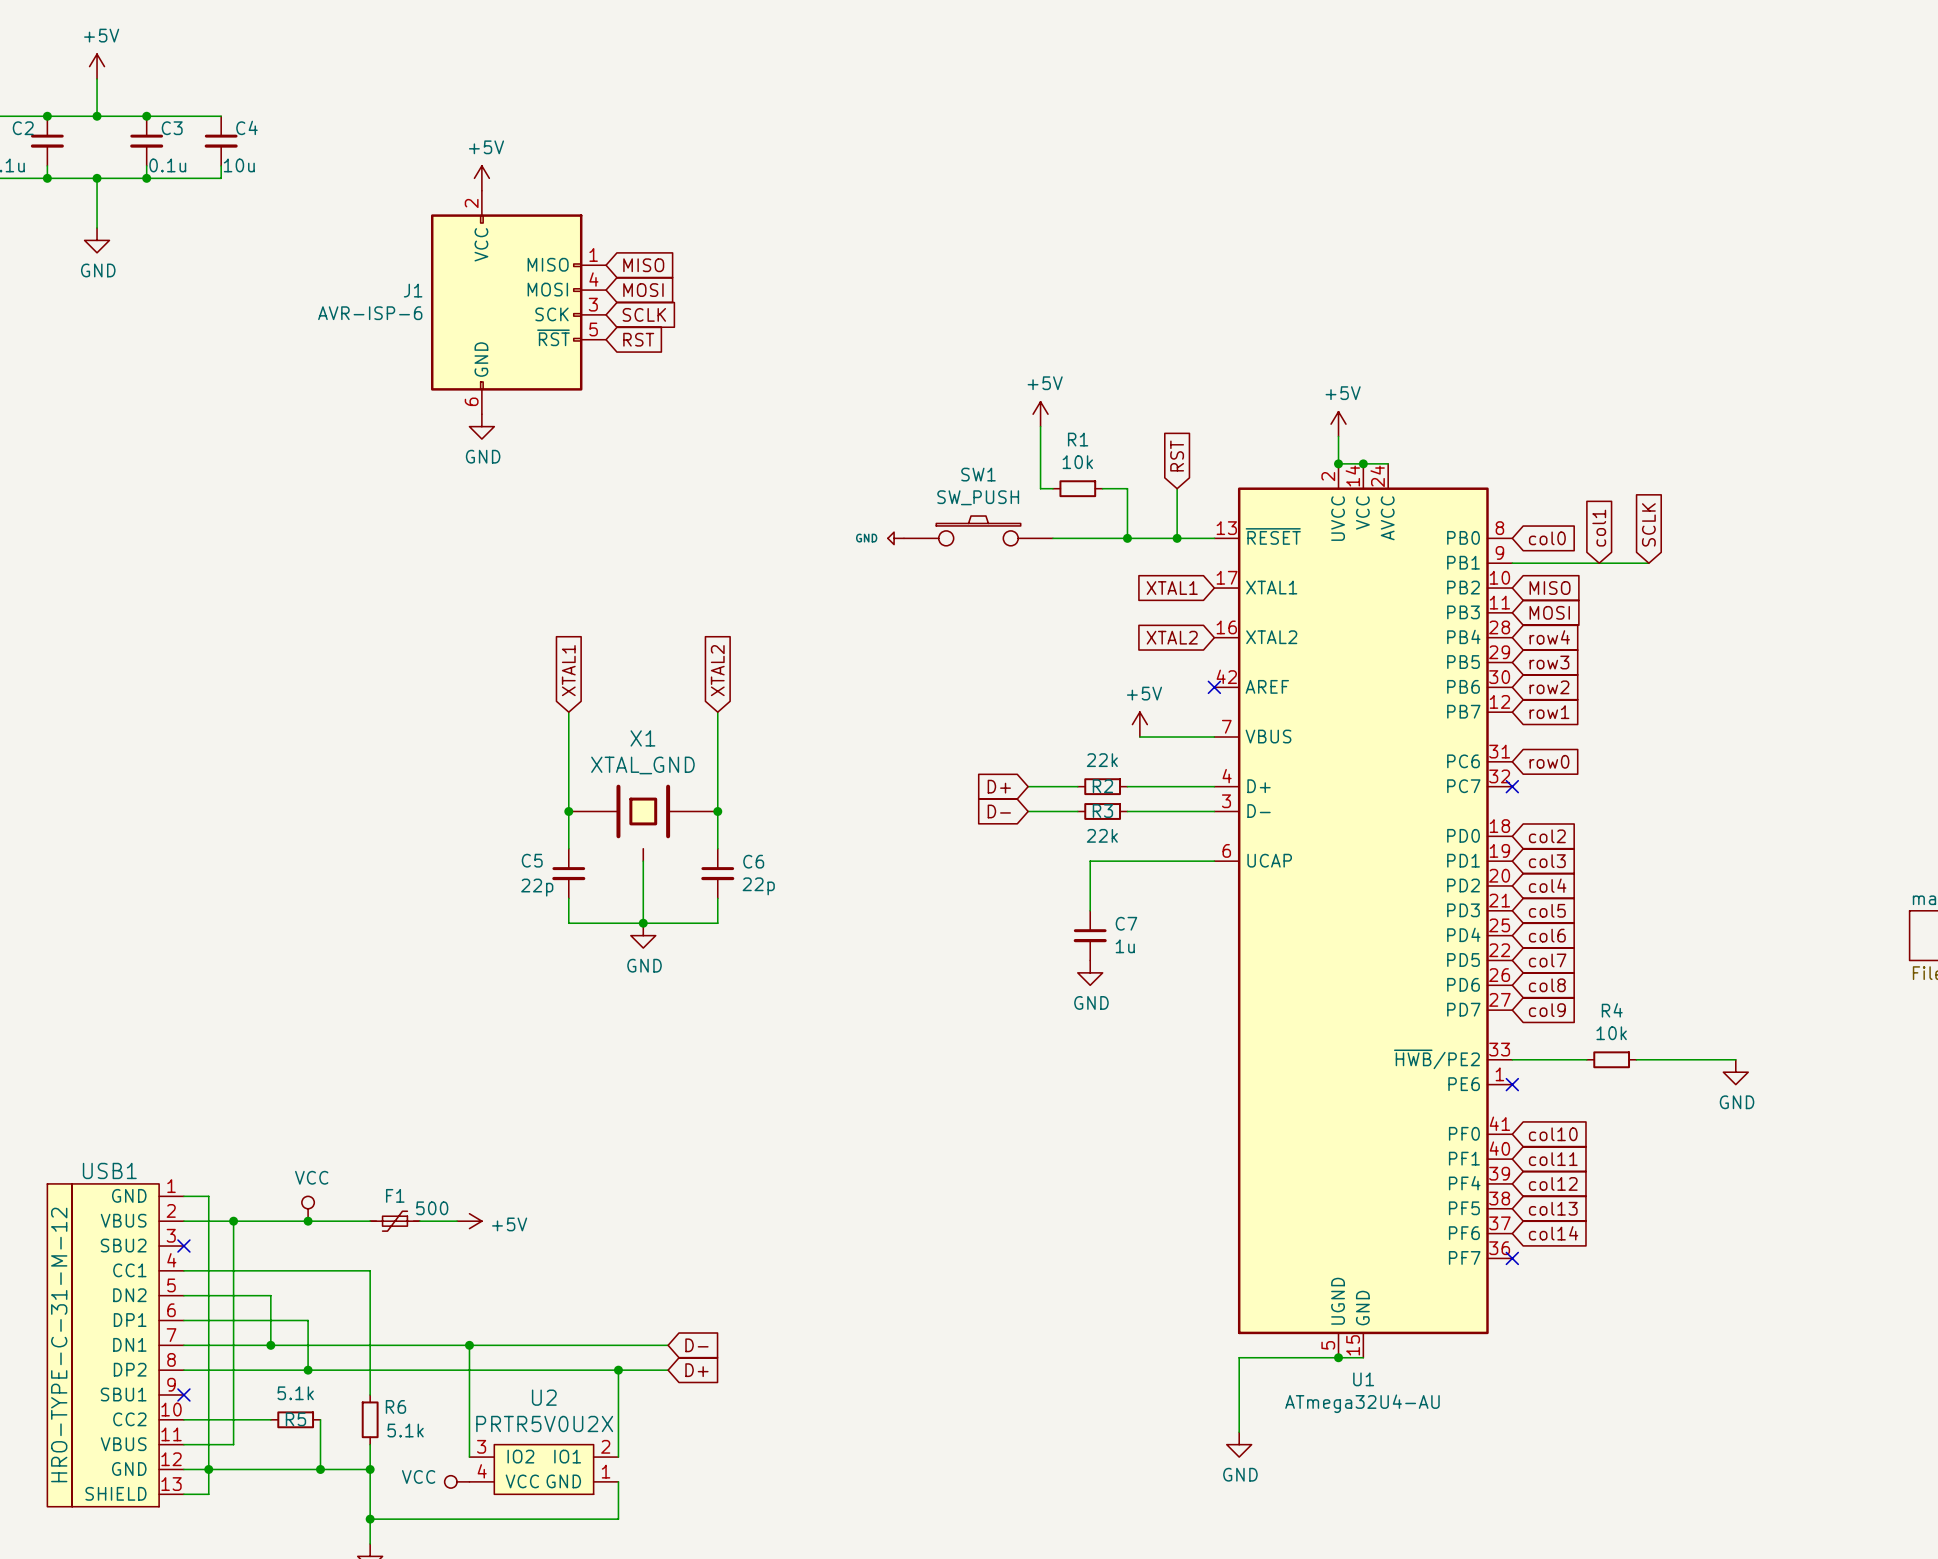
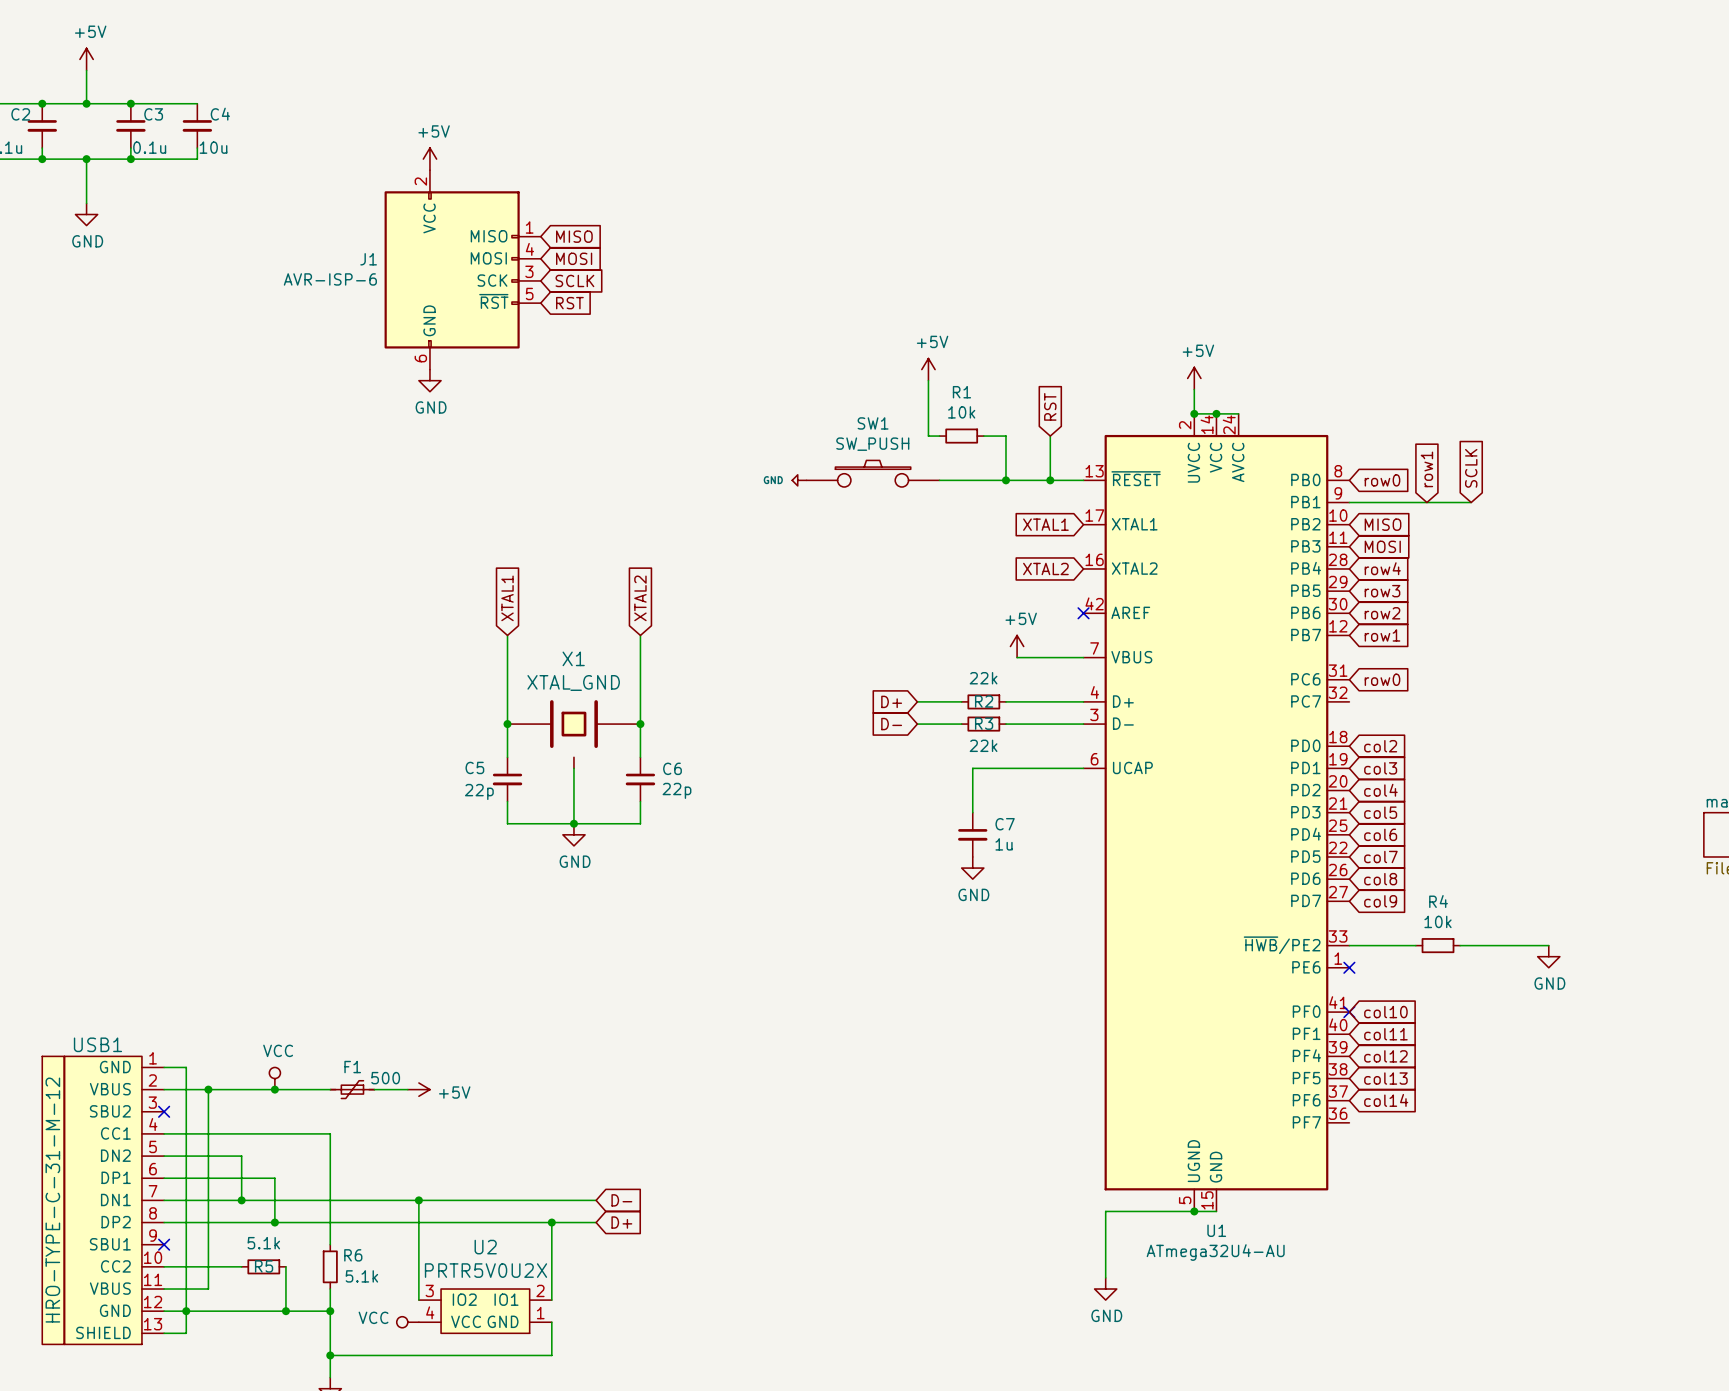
global label: col1 (1599, 528) -> row1 (1426, 469)
global label: col0 (1547, 538) -> row0 (1382, 480)
no-connect mark: (1512, 786) -> none
no-connect mark: none -> (1349, 1012)
no-connect mark: (1512, 1258) -> none

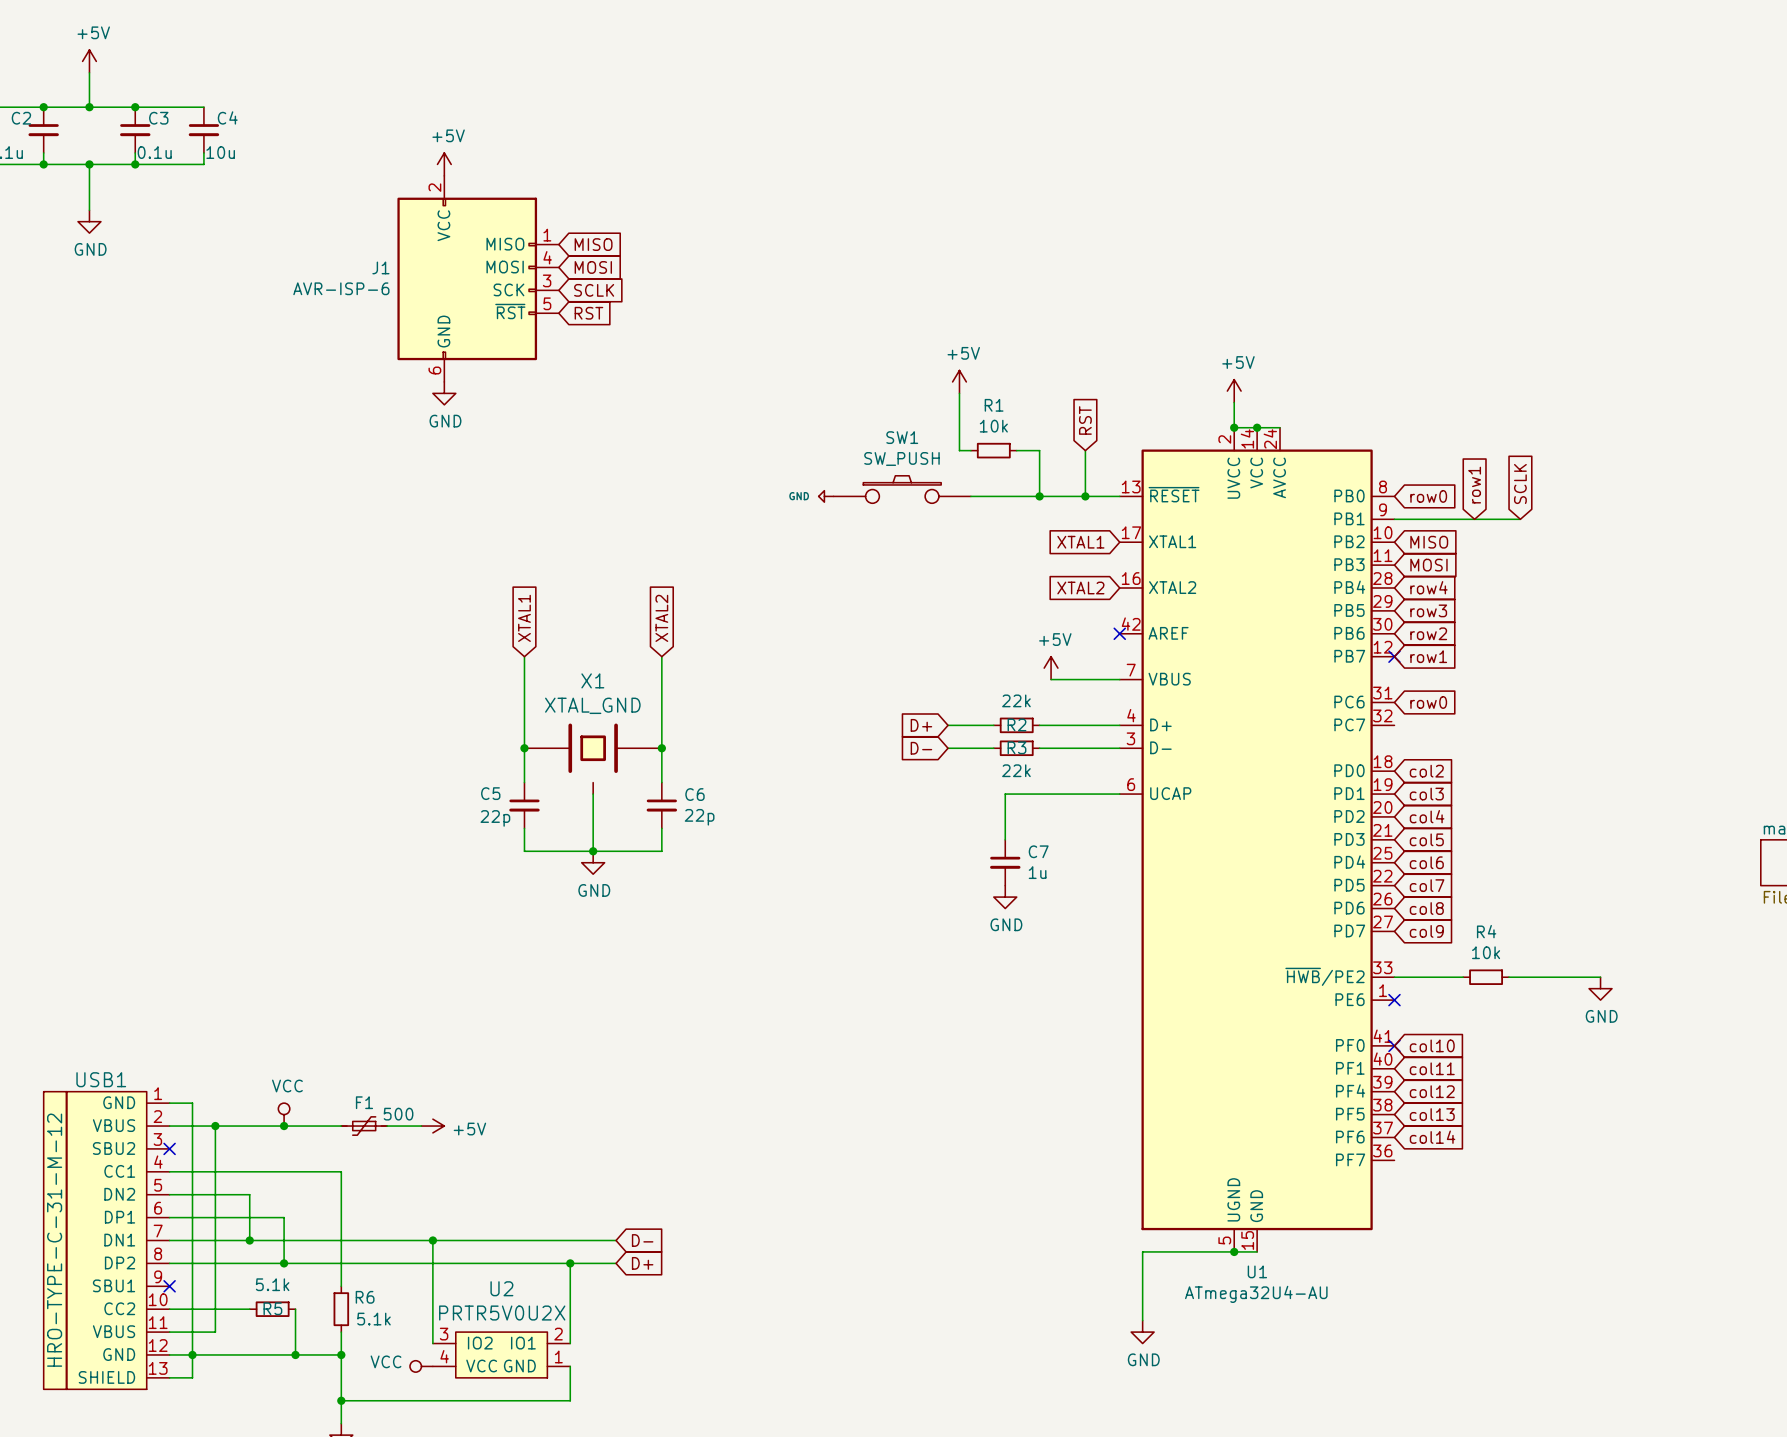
no-connect mark: none -> (1394, 656)

